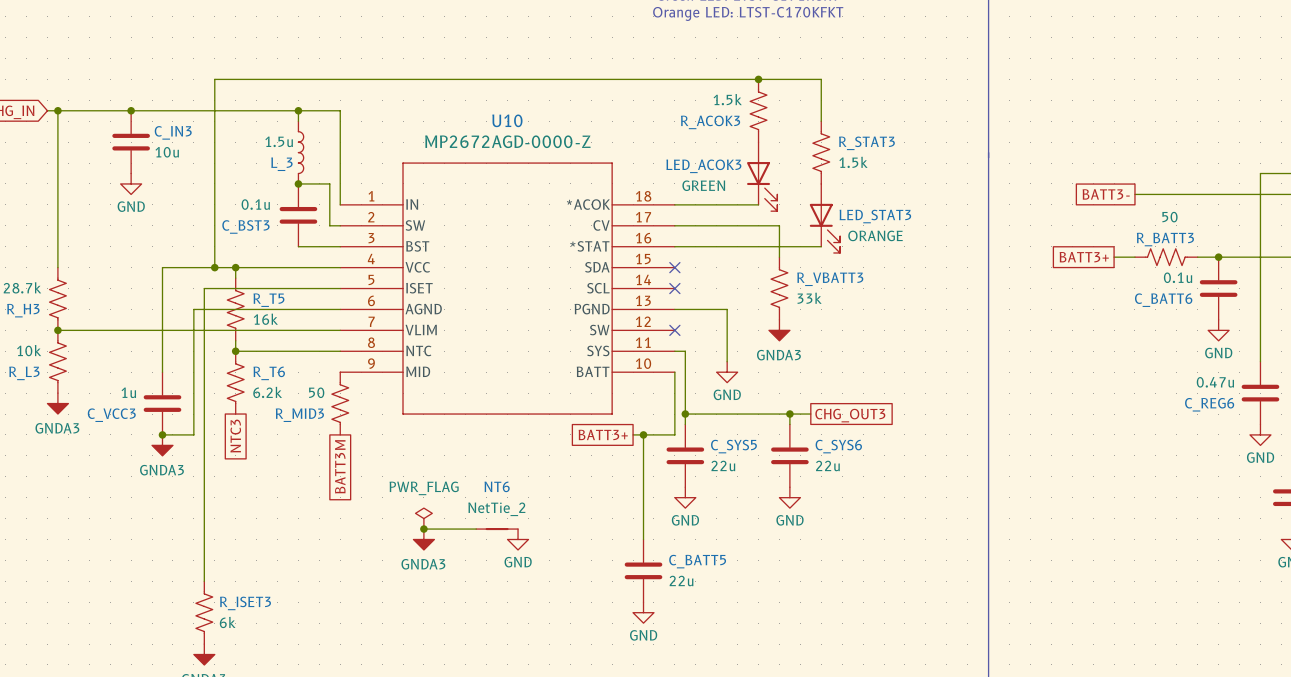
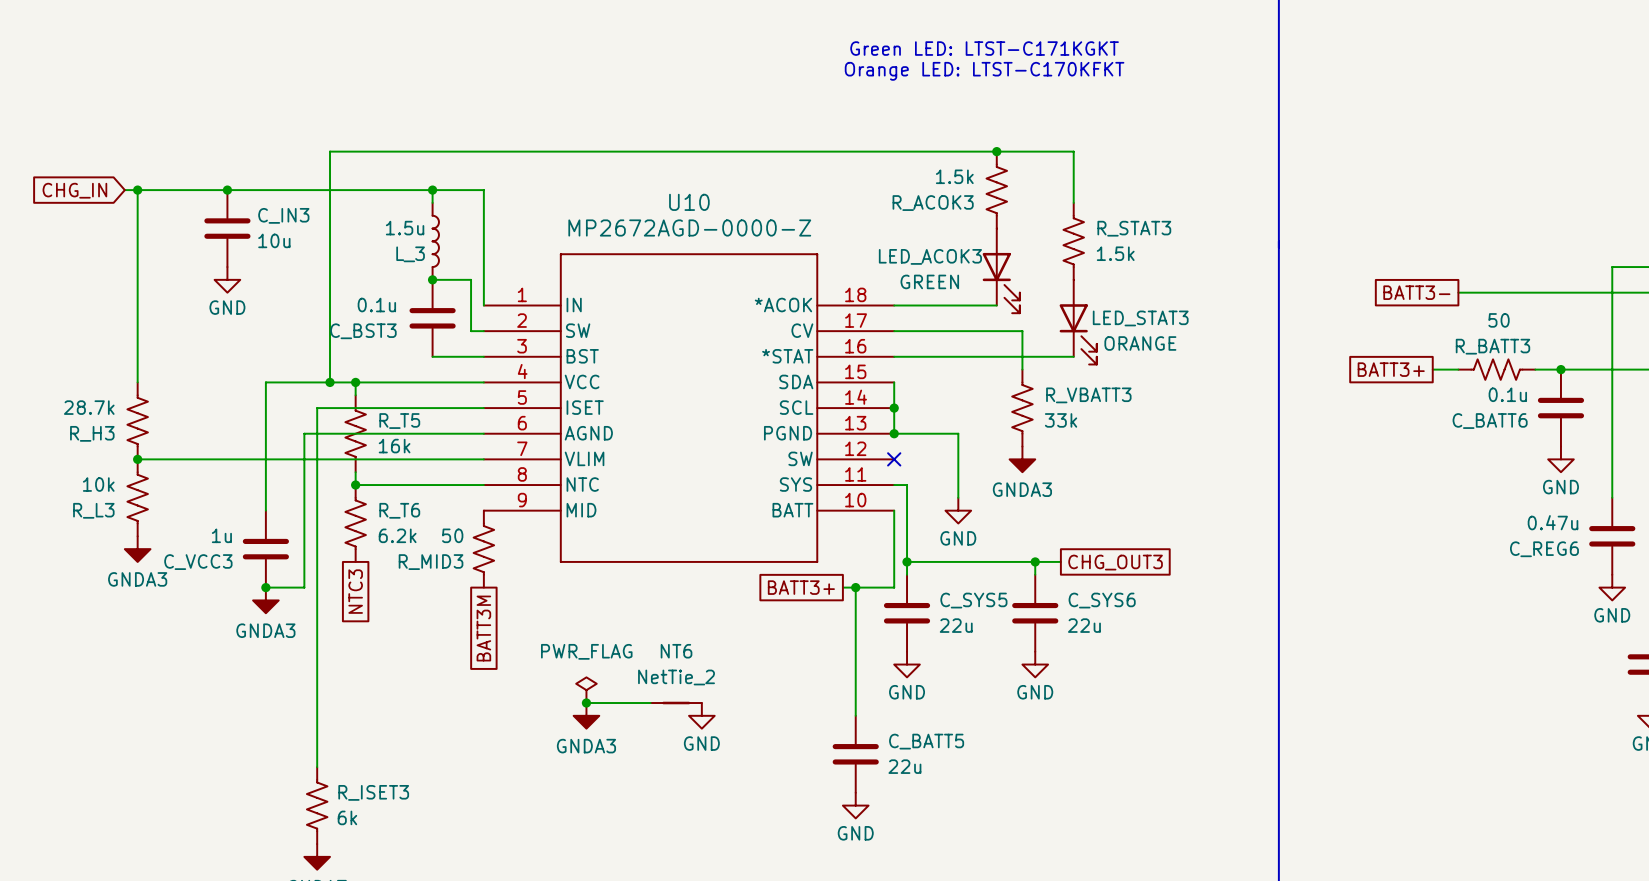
wire: none -> (894, 382) (894, 433)
no-connect mark: (674, 267) -> none
no-connect mark: (674, 288) -> none
junction: none -> (894, 408)
junction: none -> (894, 433)

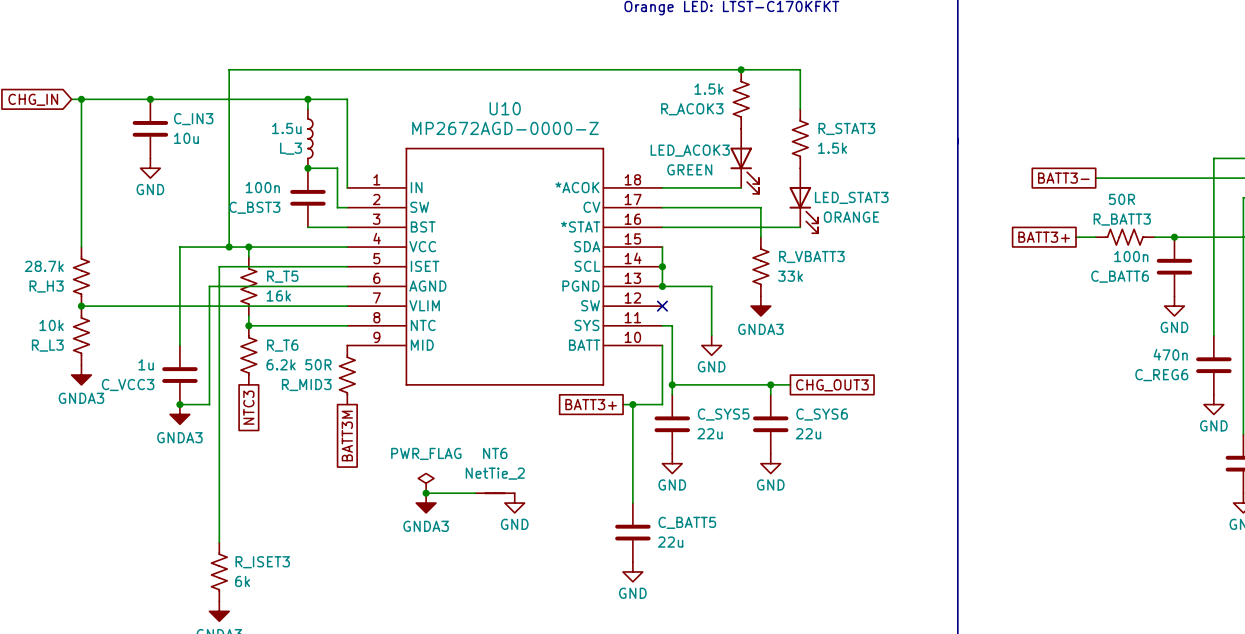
C_BST3 value: 0.1u (376, 305) -> 100n (262, 187)
R_BATT3 value: 50 (1499, 320) -> 50R (1121, 199)
C_BATT6 value: 0.1u (1507, 394) -> 100n (1131, 256)
C_REG6 value: 0.47u (1553, 522) -> 470n (1170, 354)
R_MID3 value: 50 (452, 535) -> 50R (318, 364)

